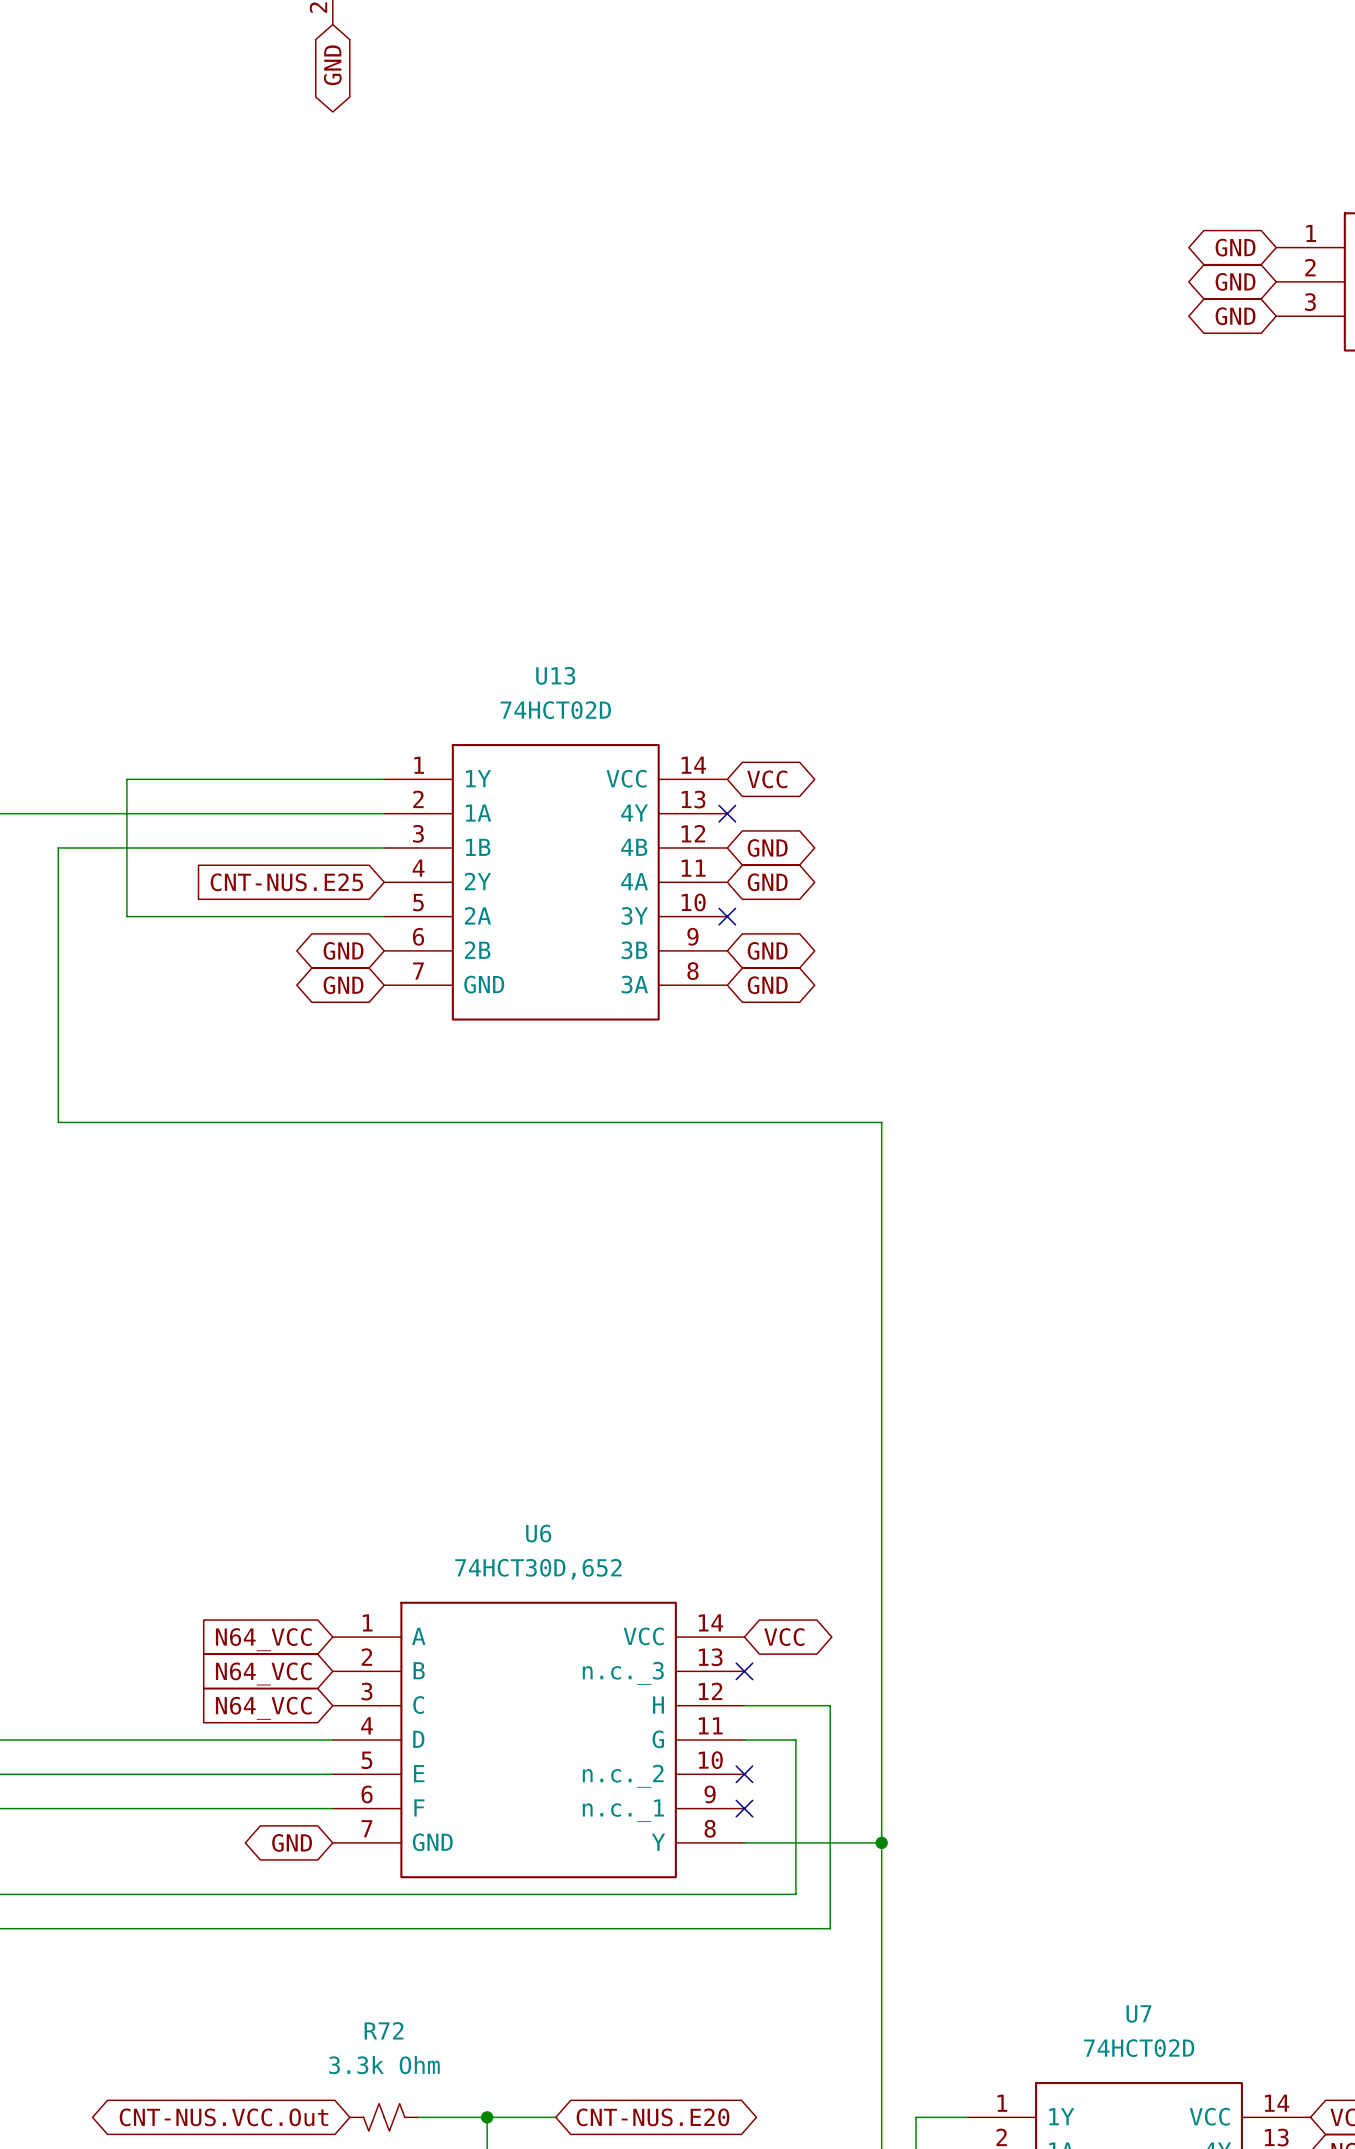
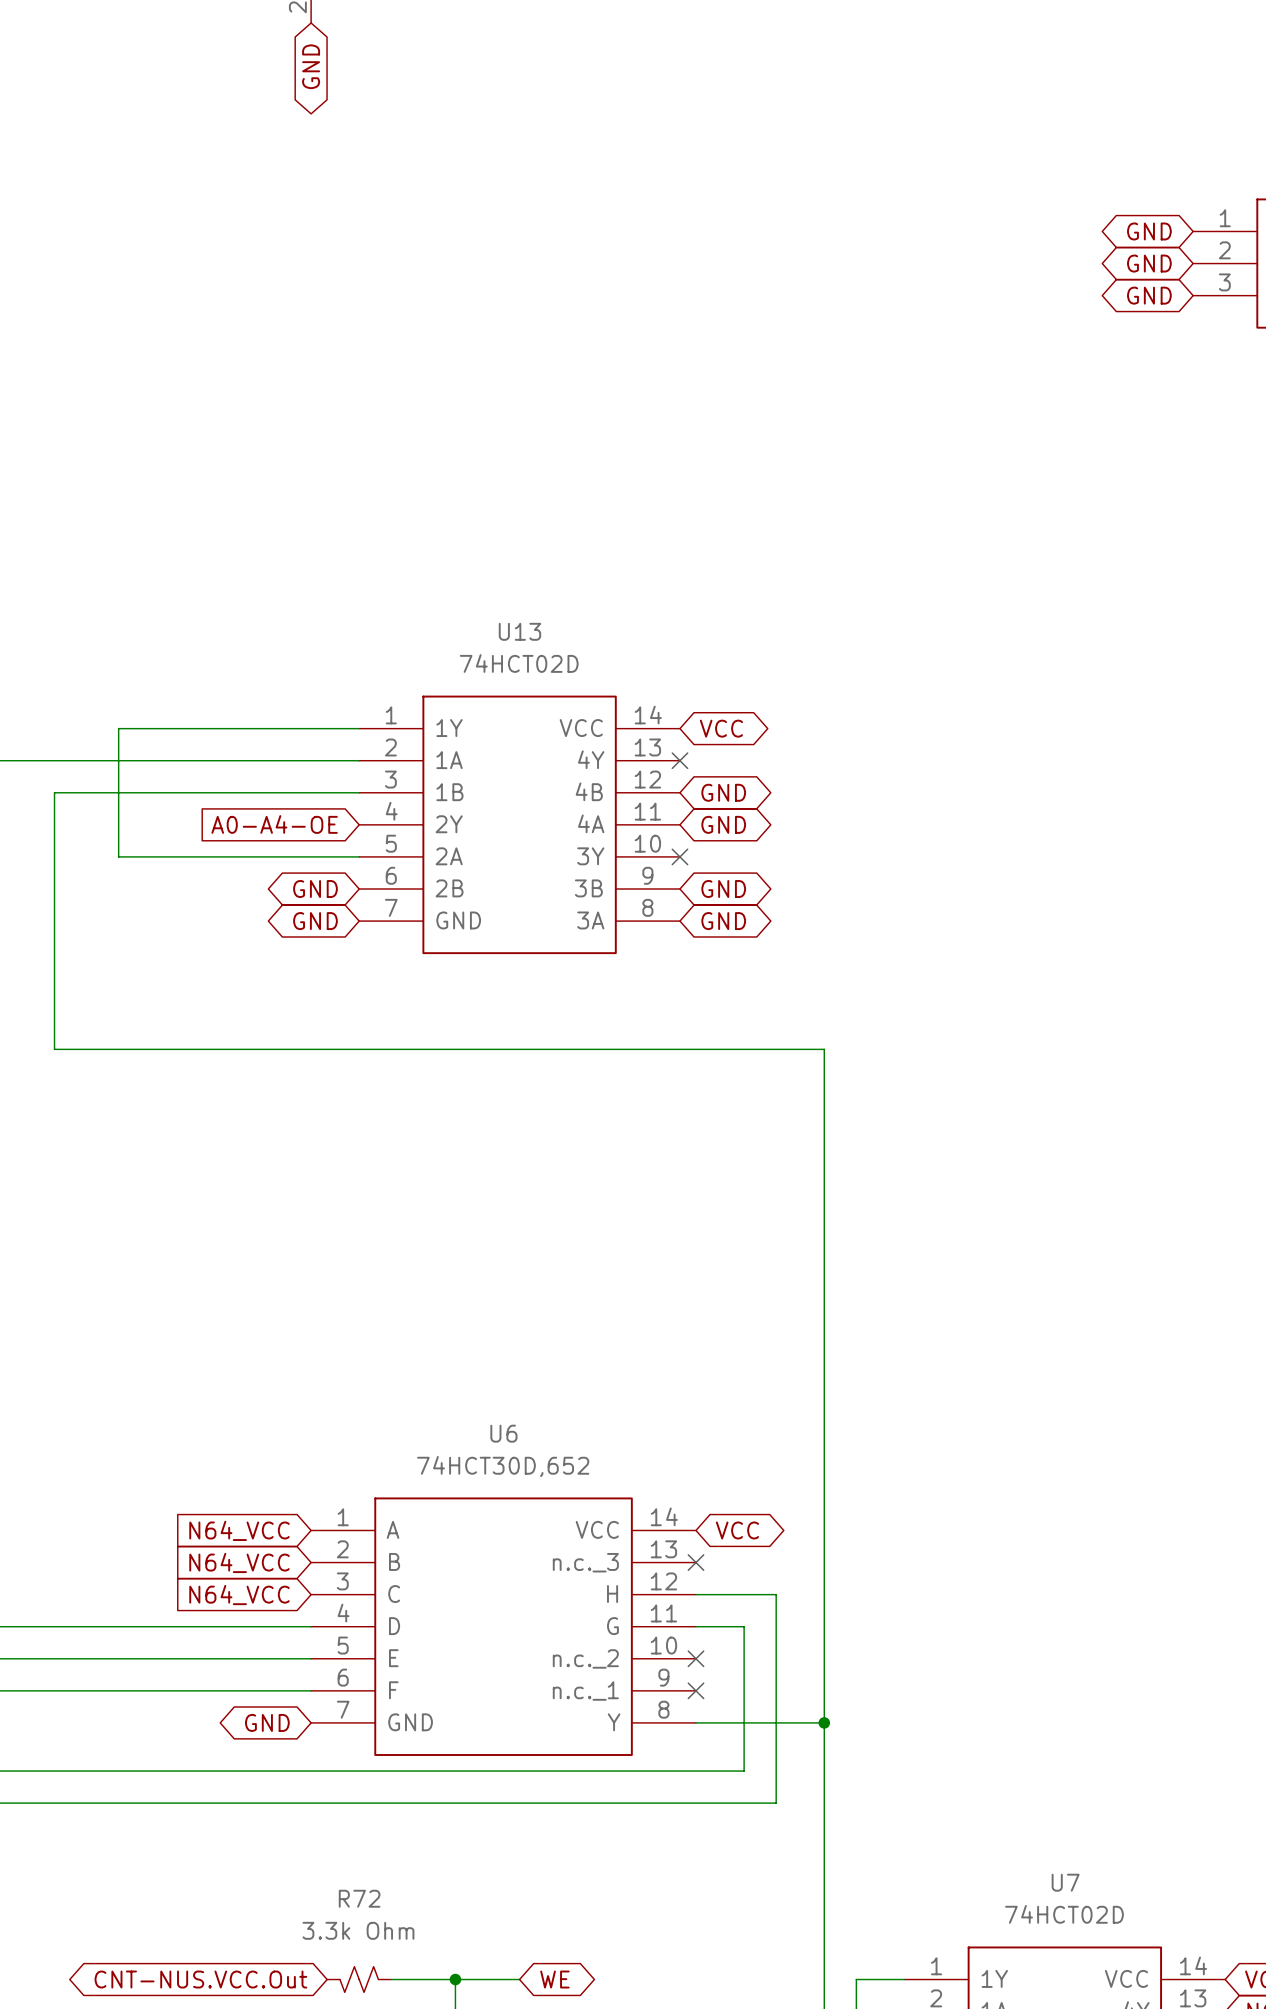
global label: CNT-NUS.E25 (286, 882) -> A0-A4-OE (274, 824)
global label: CNT-NUS.E20 (653, 2117) -> WE (554, 1979)

